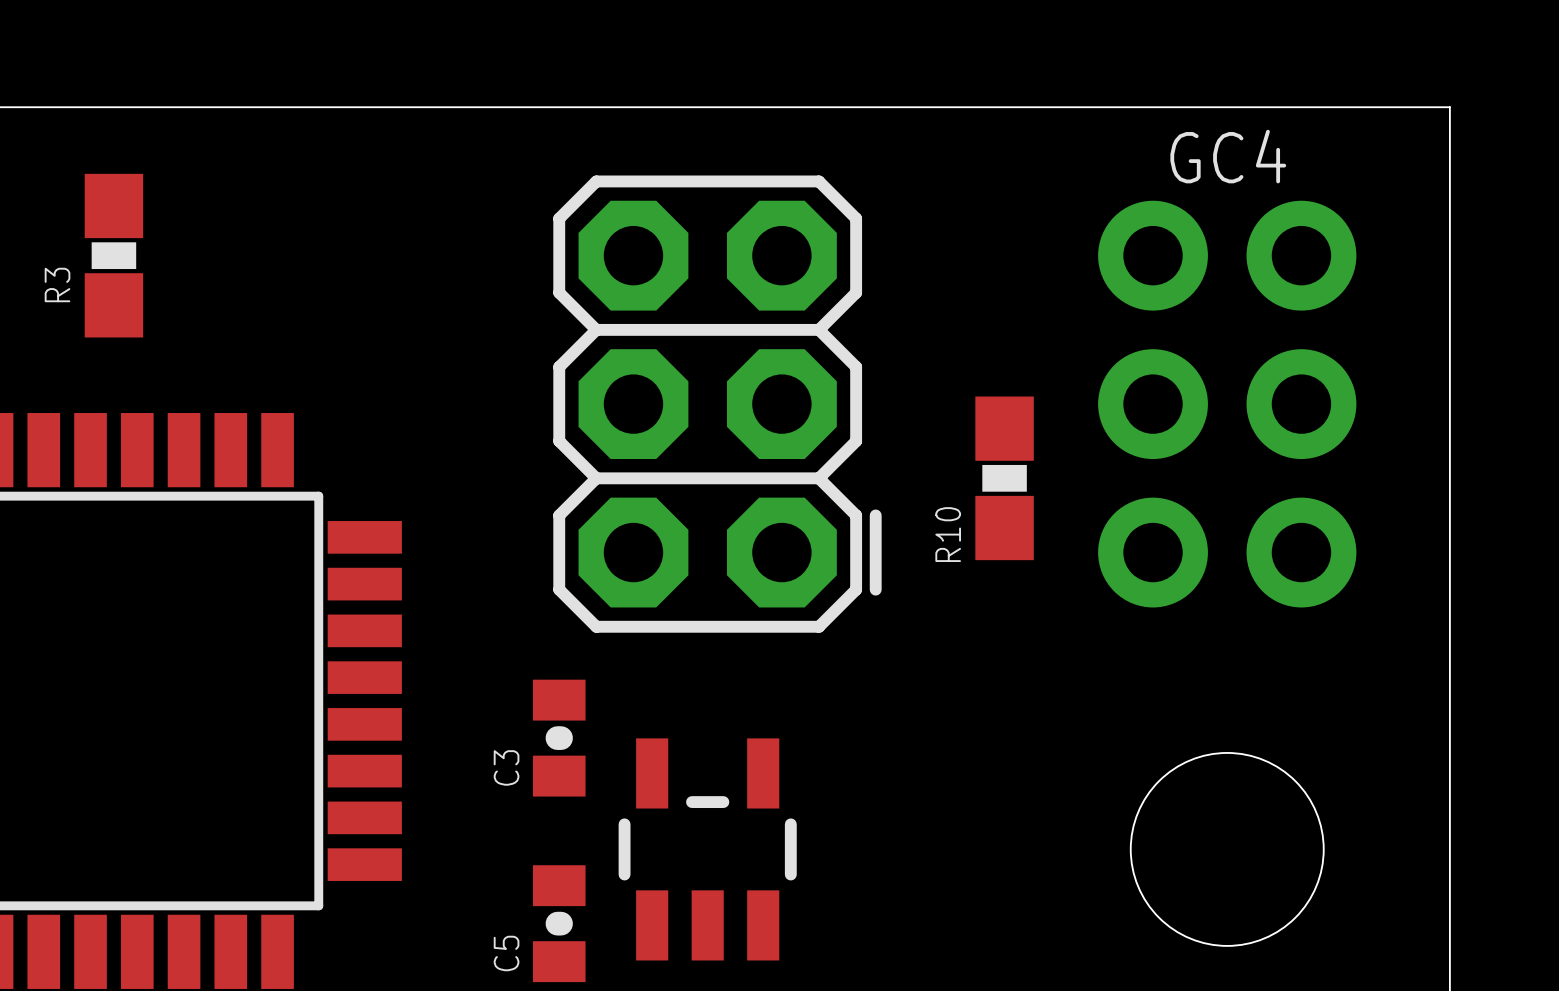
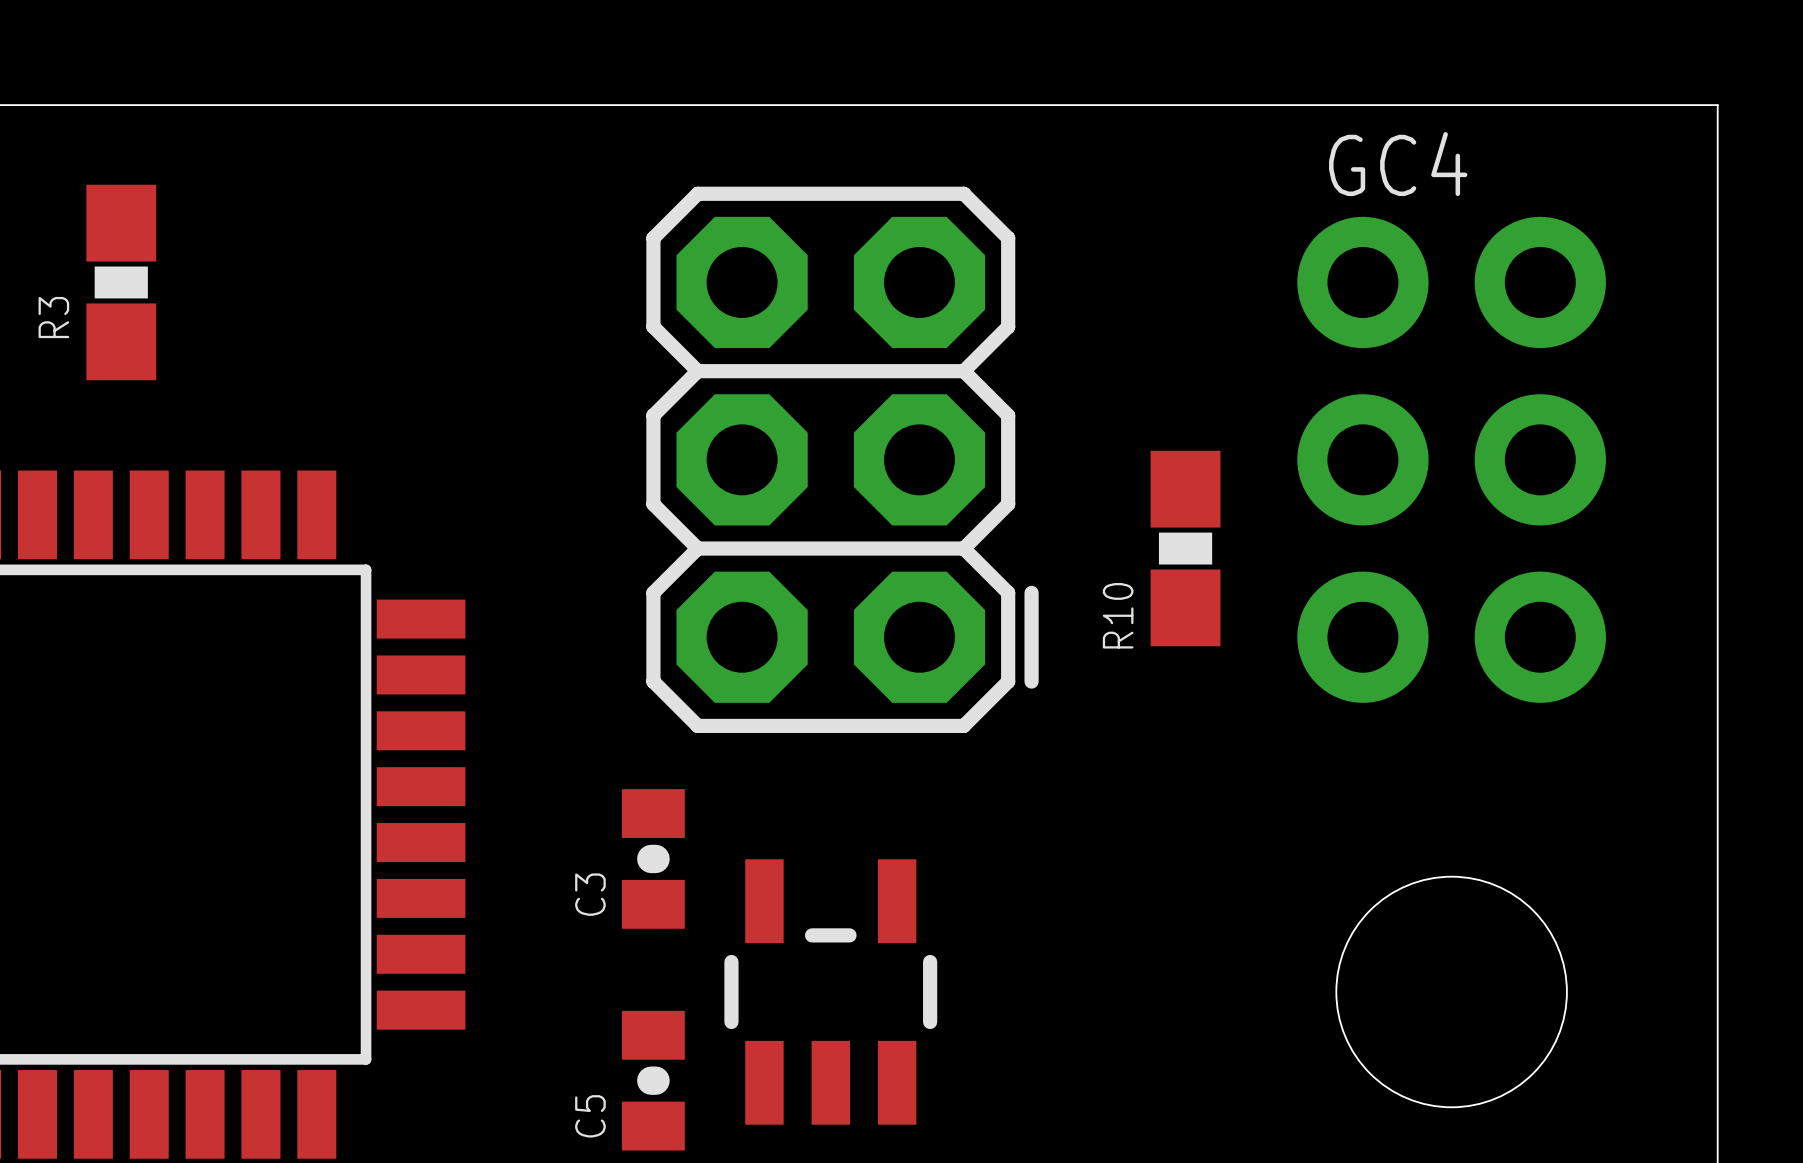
GC4 name position: GC4 (1228, 156) -> GC4 (1398, 164)

